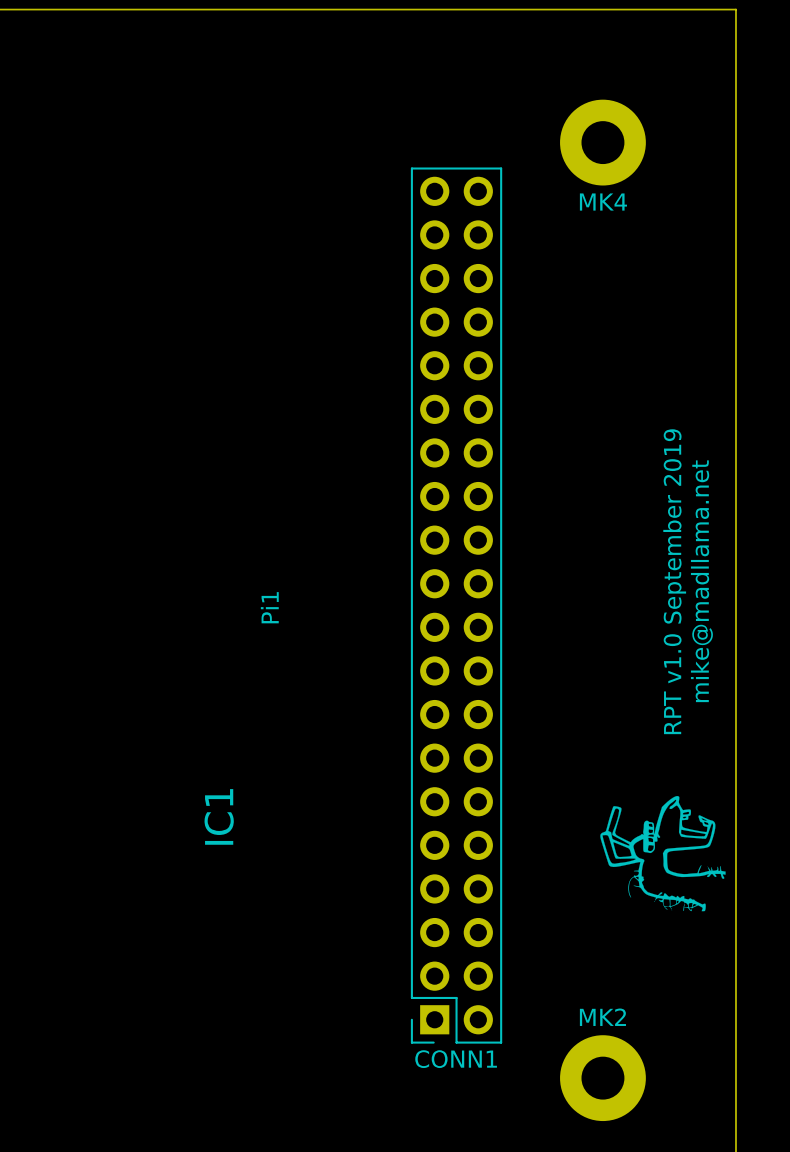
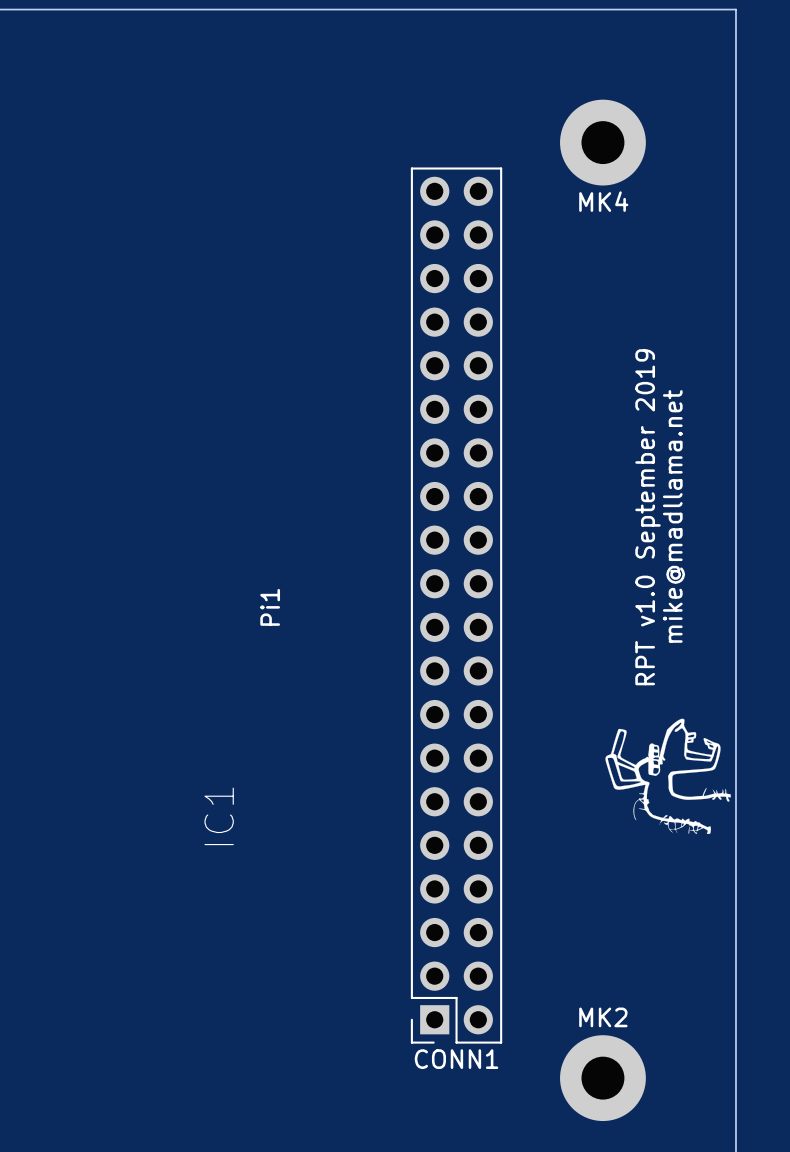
text position: RPT v1.0 September 2019 (674, 581) -> RPT v1.0 September 2019 (648, 517)
text position: mike@madllama.net (701, 581) -> mike@madllama.net (674, 516)
drawing position: (662, 853) -> (668, 776)

